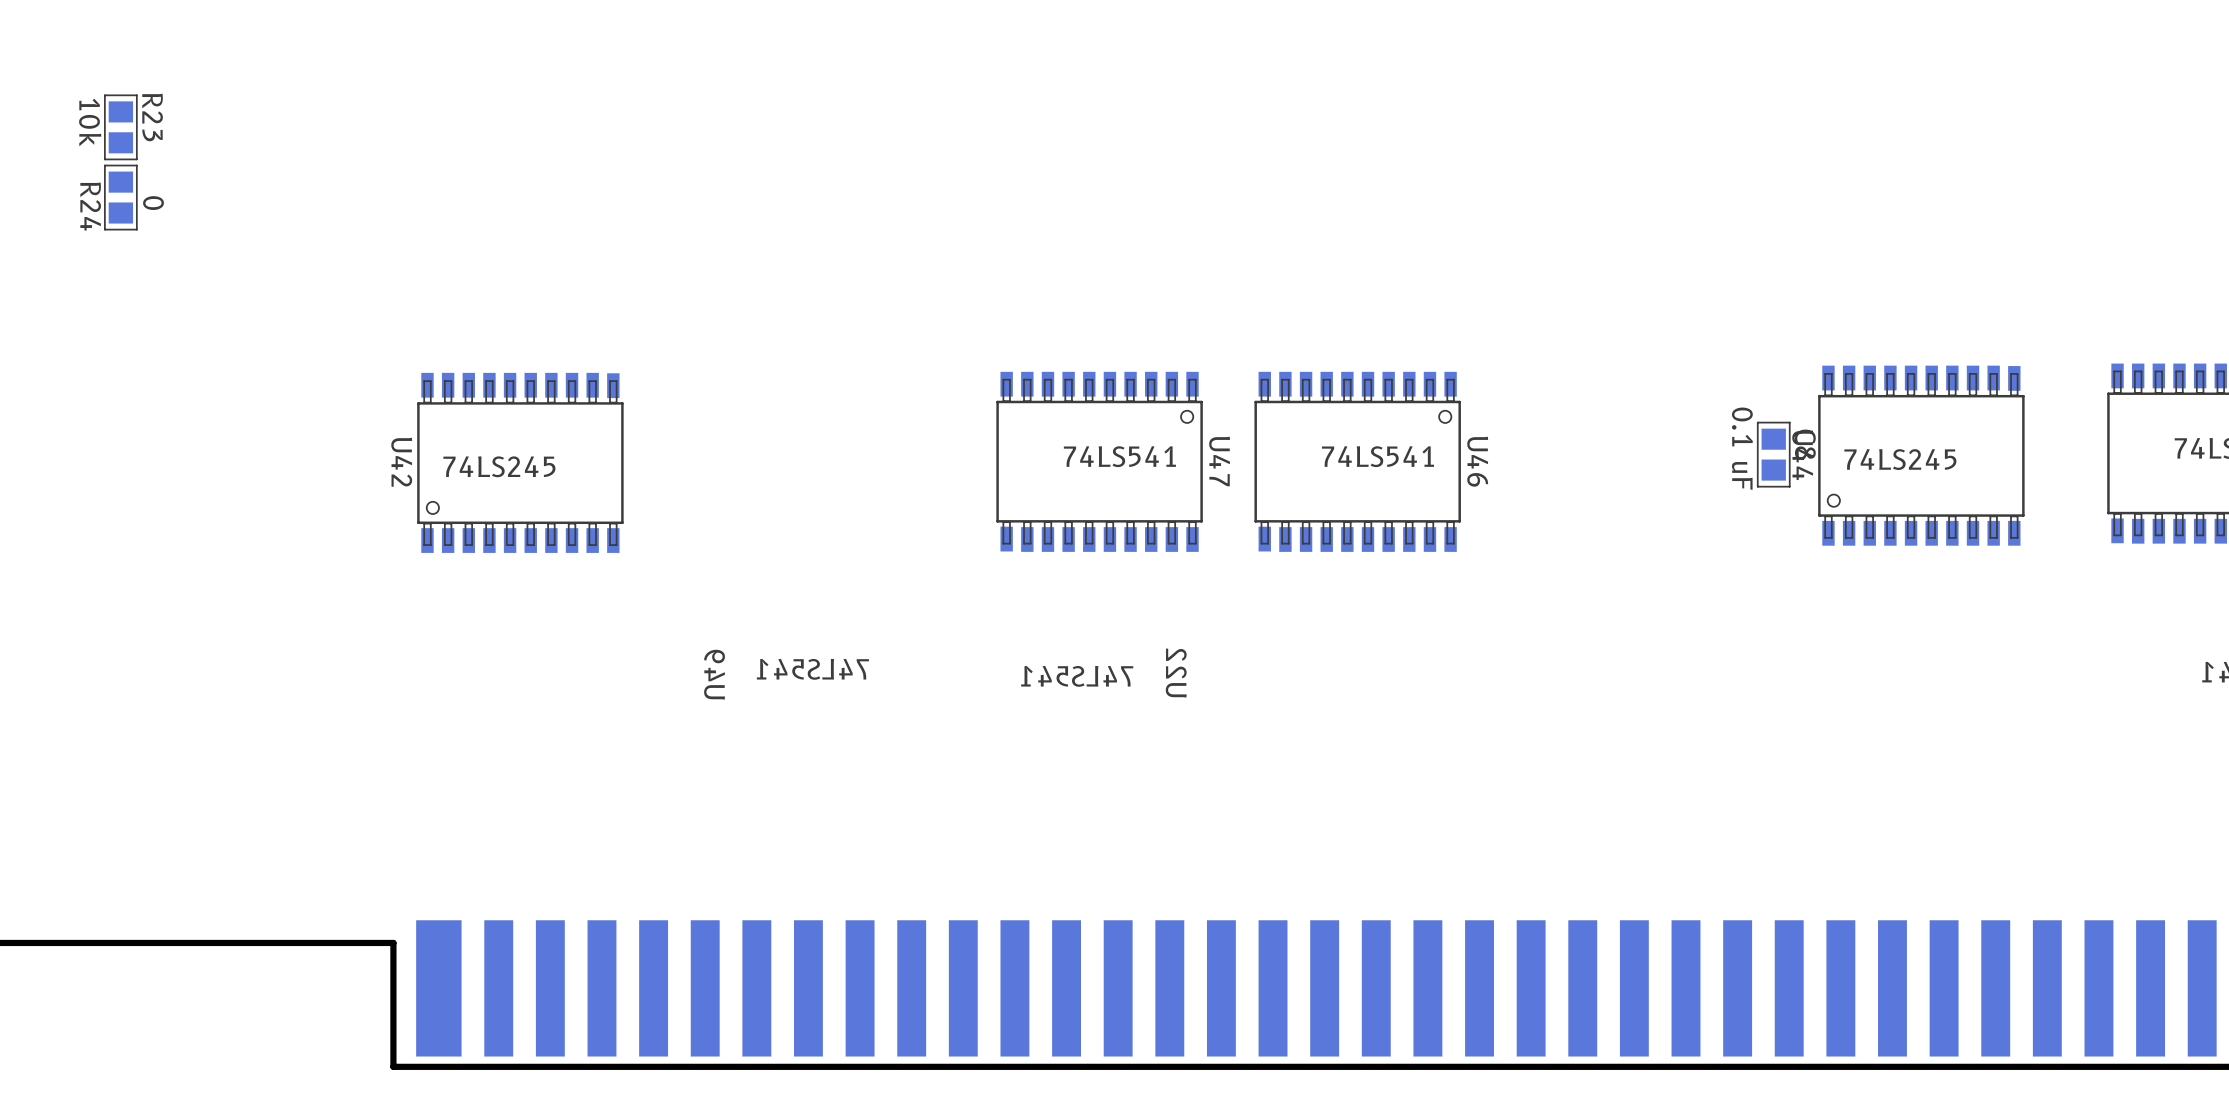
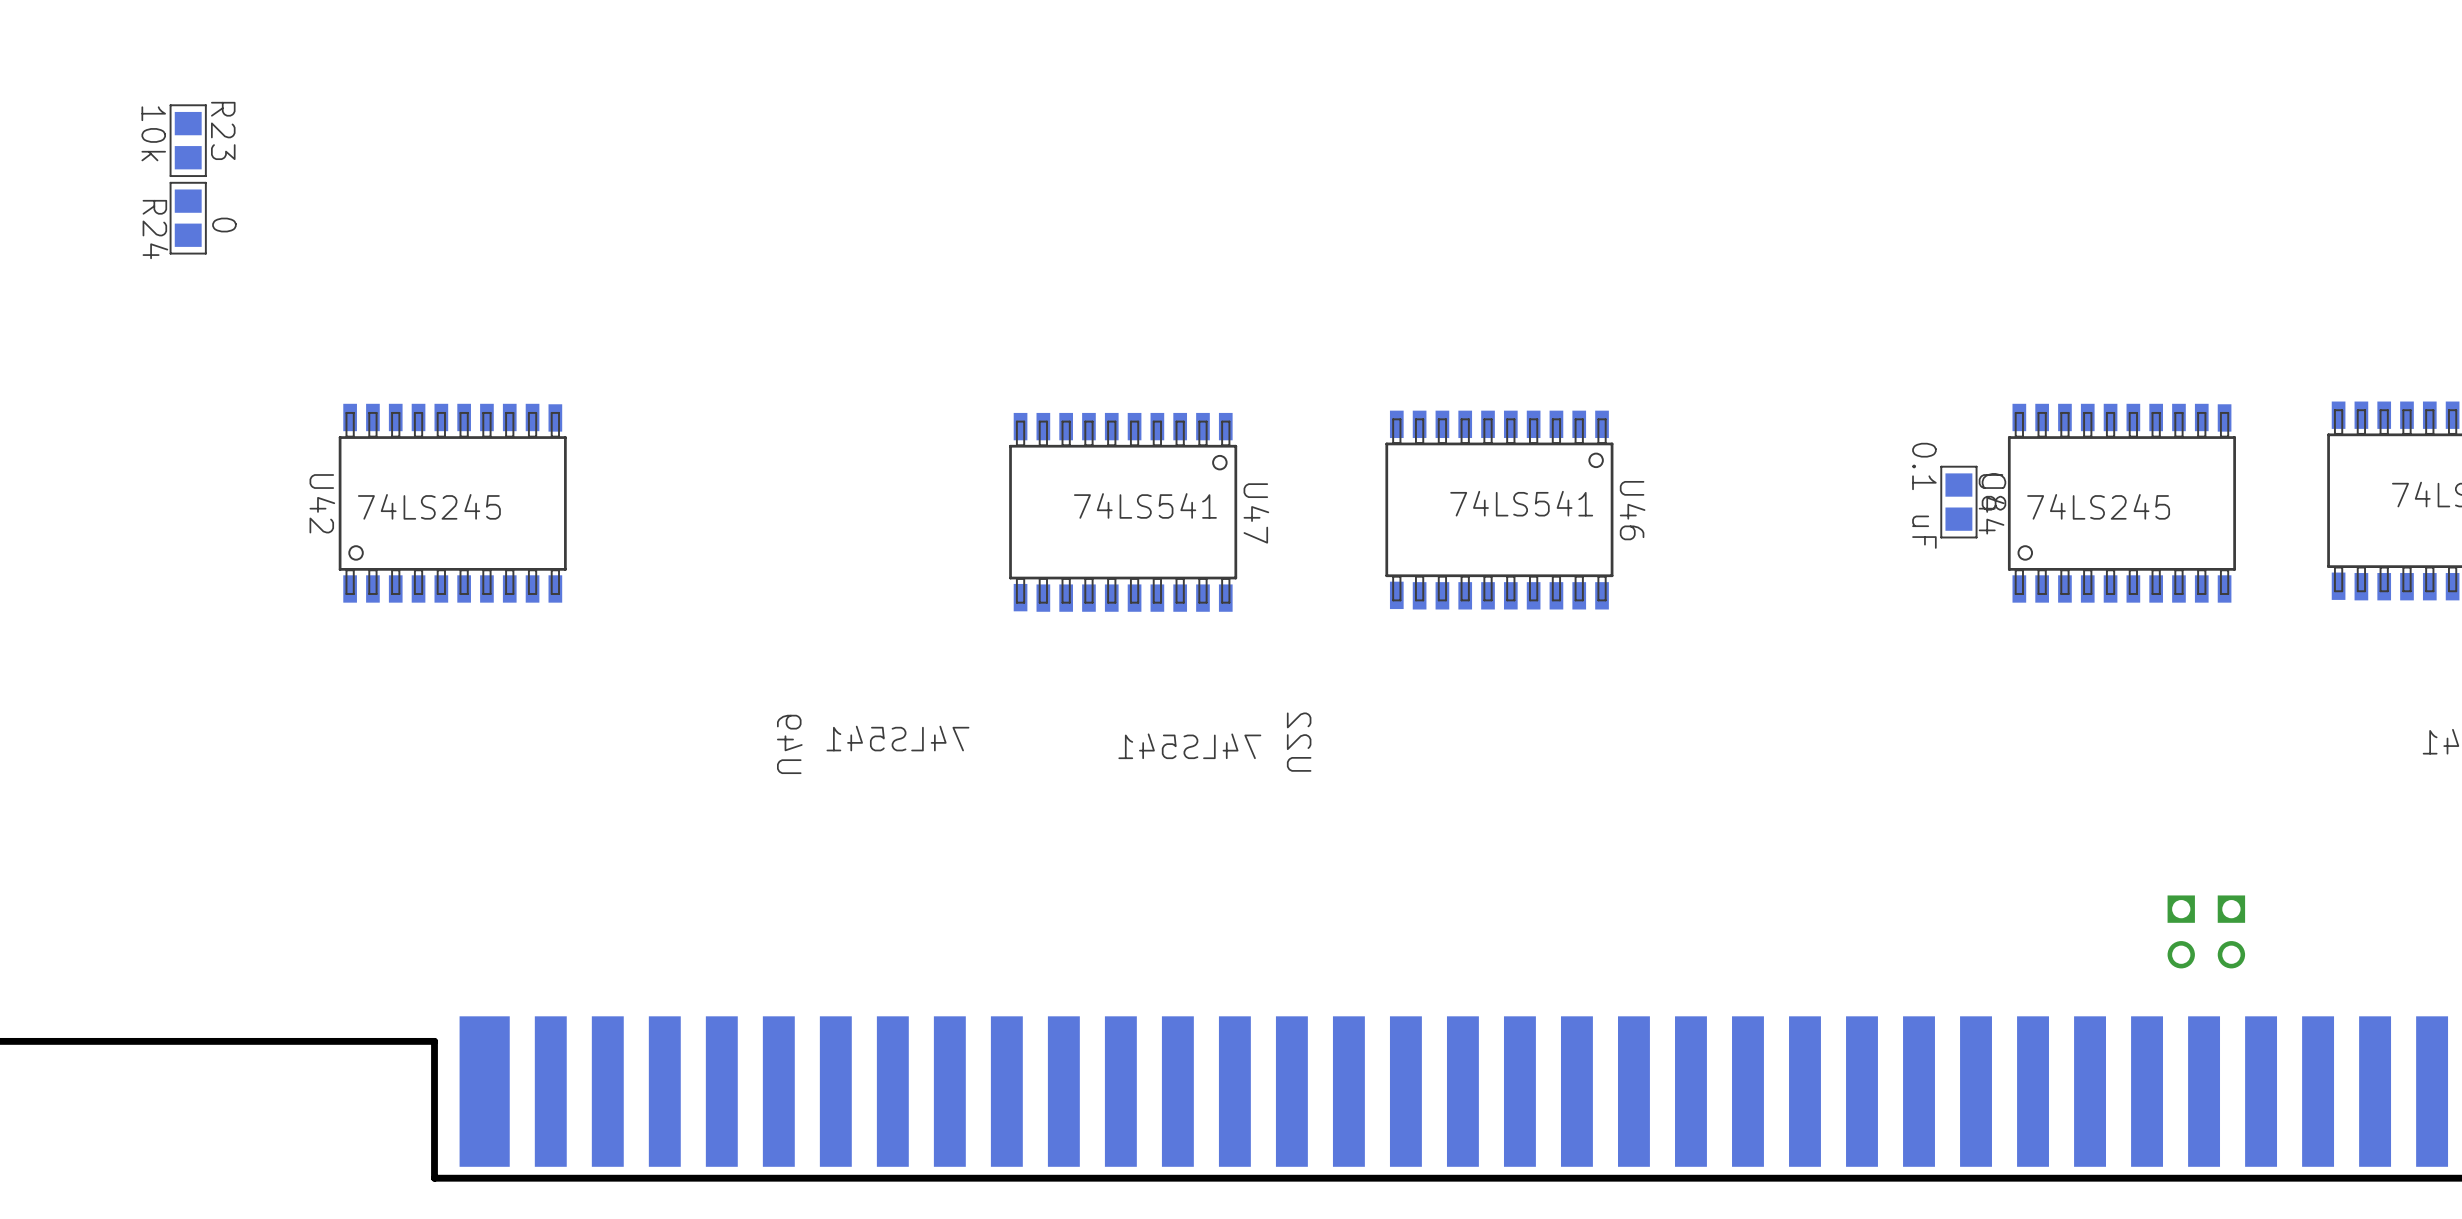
R23 position: (120, 127) -> (188, 140)
R24 position: (120, 197) -> (188, 218)
U47 position: (1099, 461) -> (1123, 512)
U42 position: (520, 462) -> (452, 503)
part: none -> (2181, 931)
part: none -> (2231, 931)

